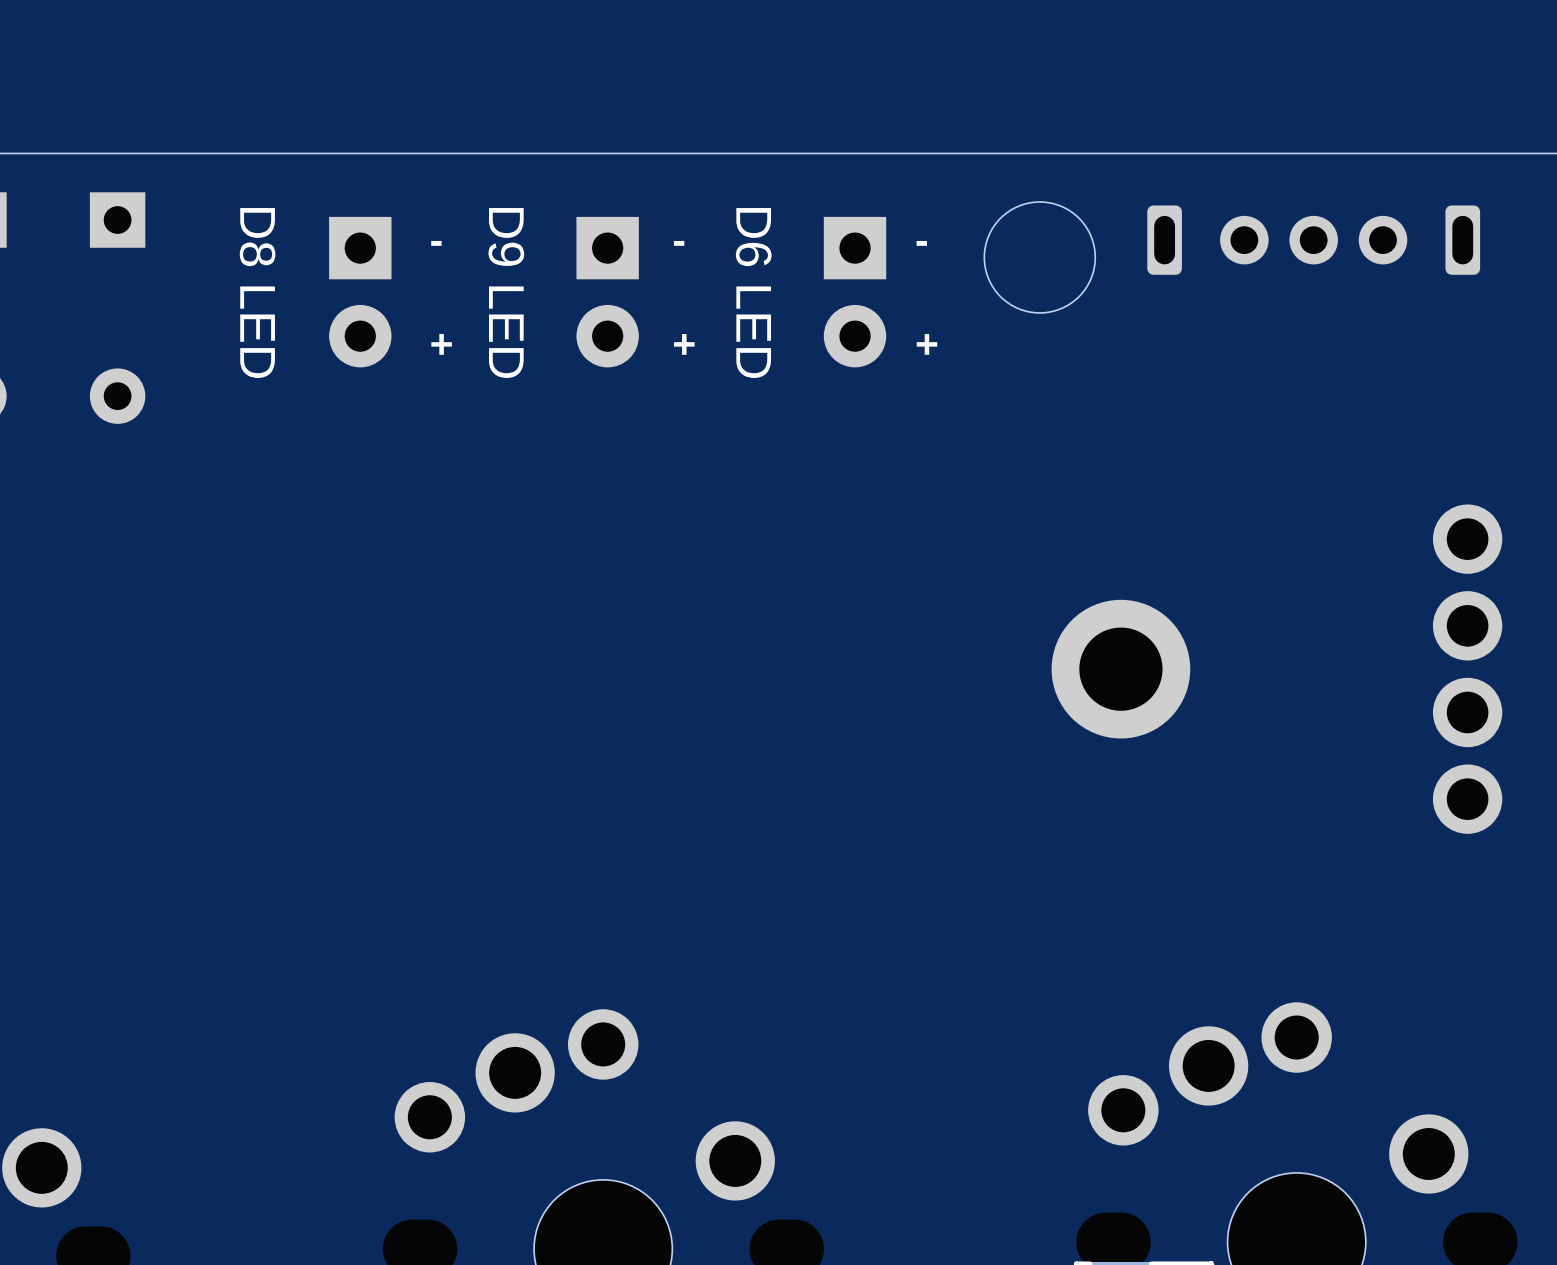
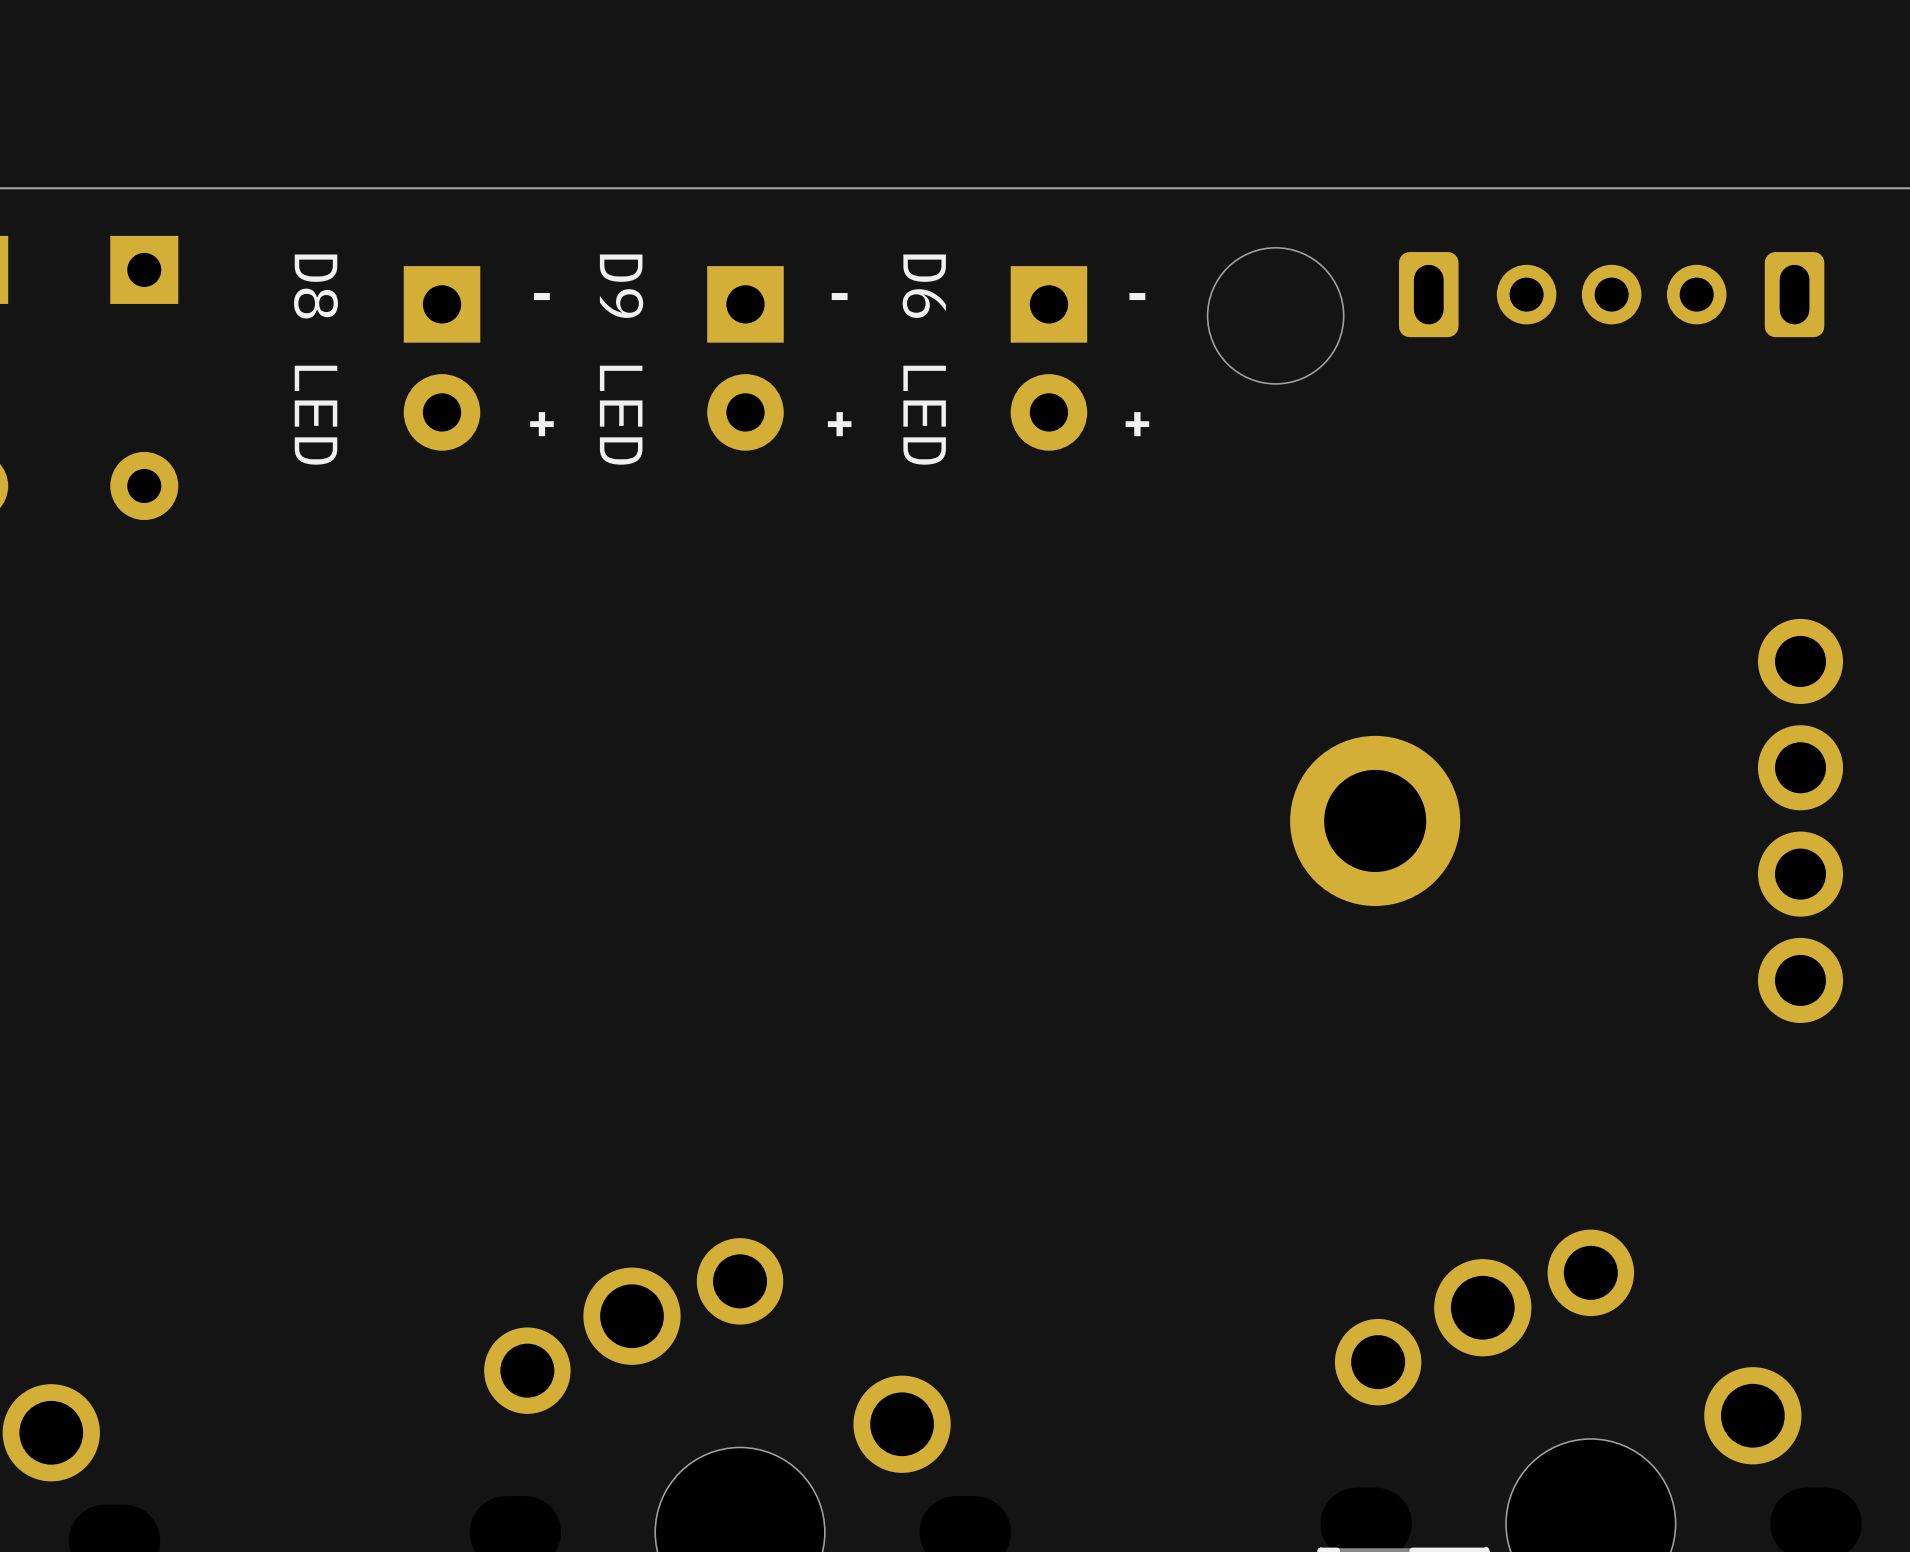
part footprint: [1147, 205, 1481, 275] -> [1398, 252, 1825, 338]

